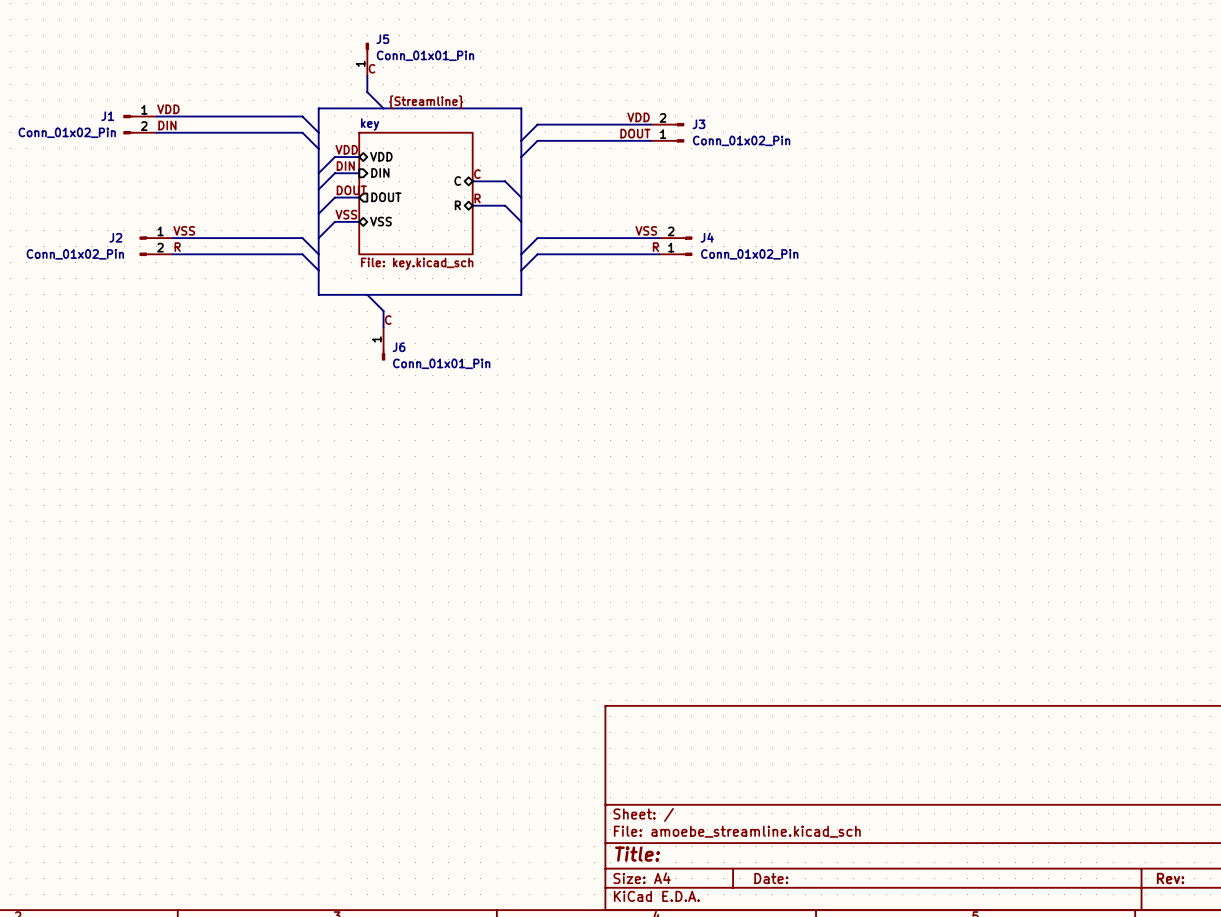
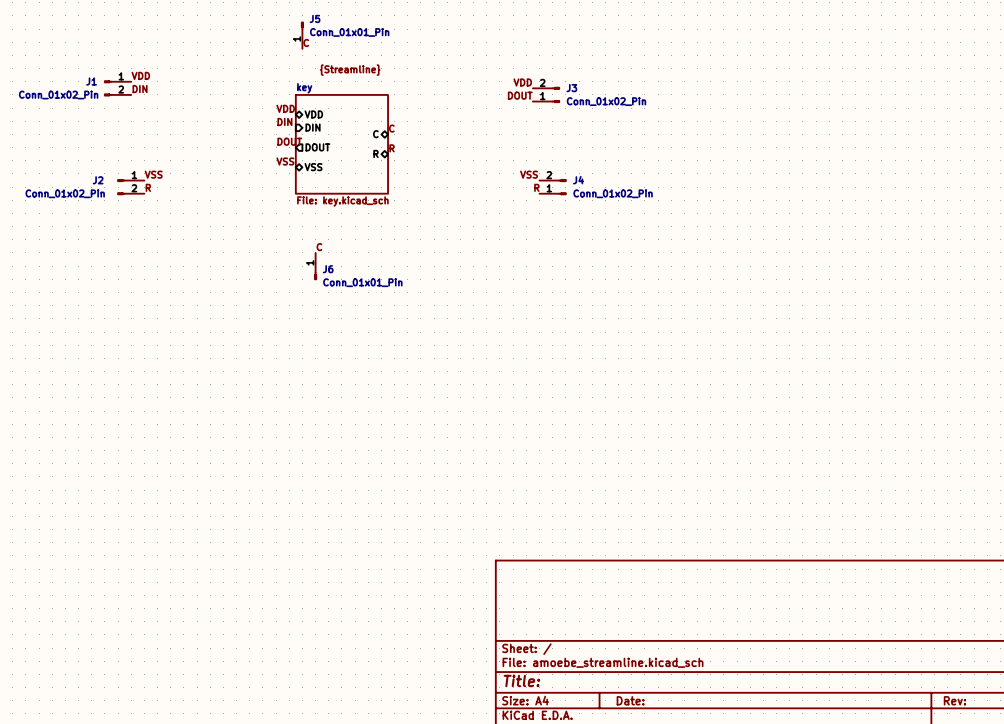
wire: (367, 75) (367, 92) (383, 108) -> none
bus: (318, 108) (318, 294) (521, 294) (521, 108) (318, 108) -> none
wire: (156, 116) (302, 116) (318, 132) -> none
wire: (651, 124) (537, 124) (521, 140) -> none
wire: (156, 132) (302, 132) (318, 148) -> none
wire: (651, 140) (537, 140) (521, 157) -> none
wire: (359, 157) (334, 157) (318, 173) -> none
wire: (359, 173) (334, 173) (318, 189) -> none
wire: (472, 181) (505, 181) (521, 197) -> none
wire: (359, 197) (334, 197) (318, 213) -> none
wire: (472, 205) (505, 205) (521, 221) -> none
wire: (359, 221) (334, 221) (318, 238) -> none
wire: (172, 238) (302, 238) (318, 254) -> none
wire: (659, 238) (537, 238) (521, 254) -> none
wire: (172, 254) (302, 254) (318, 270) -> none
wire: (659, 254) (537, 254) (521, 270) -> none
wire: (367, 294) (383, 311) (383, 327) -> none

